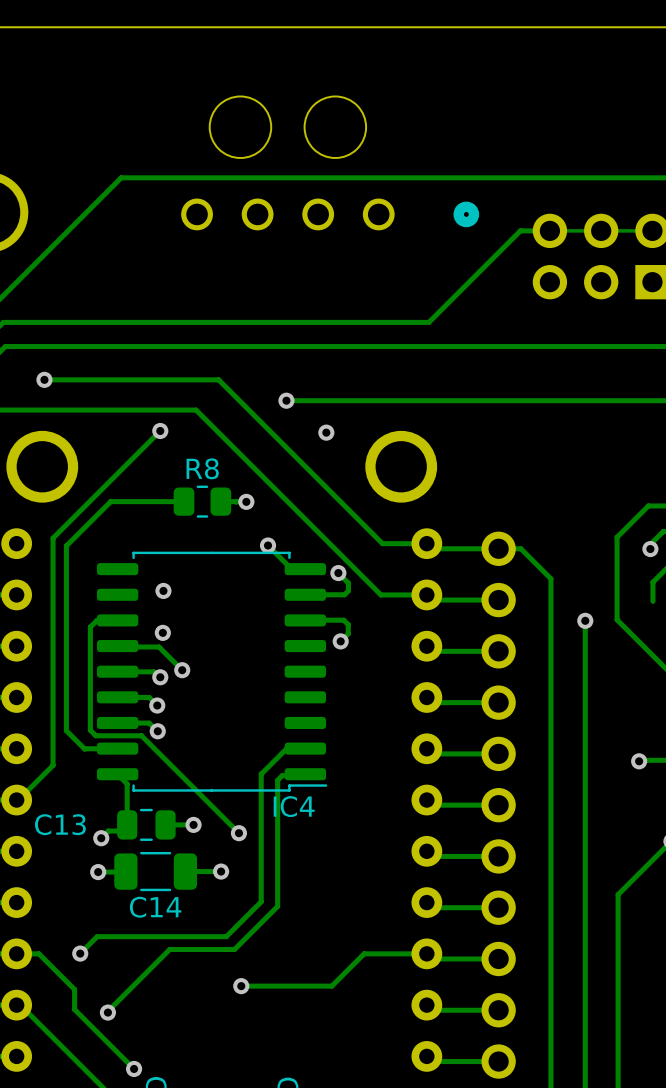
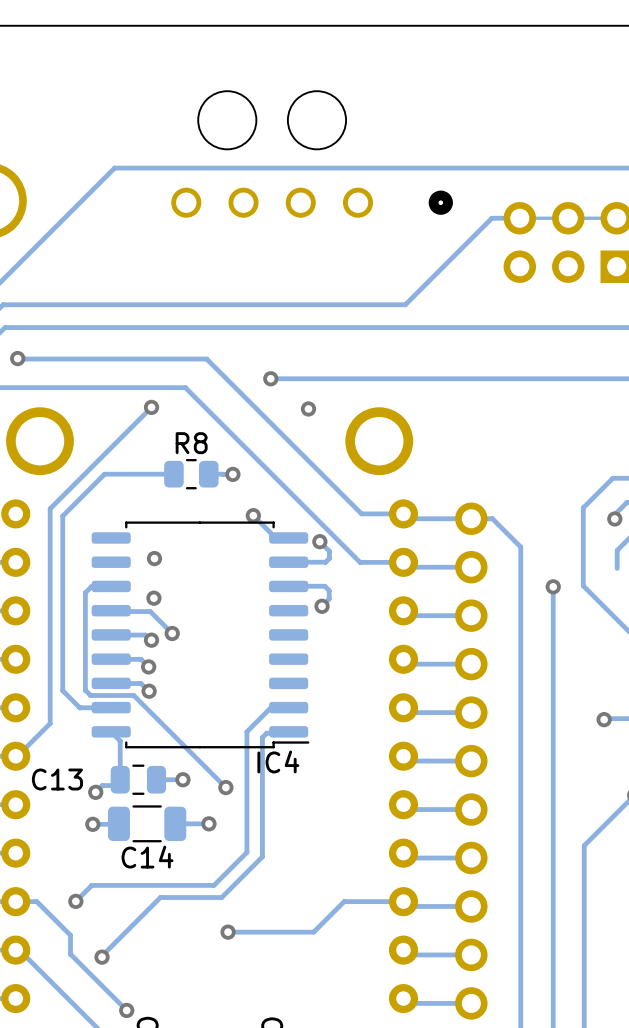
track: none -> (17, 358) (42, 359)
via: none -> (17, 358)
via: (44, 379) -> none

